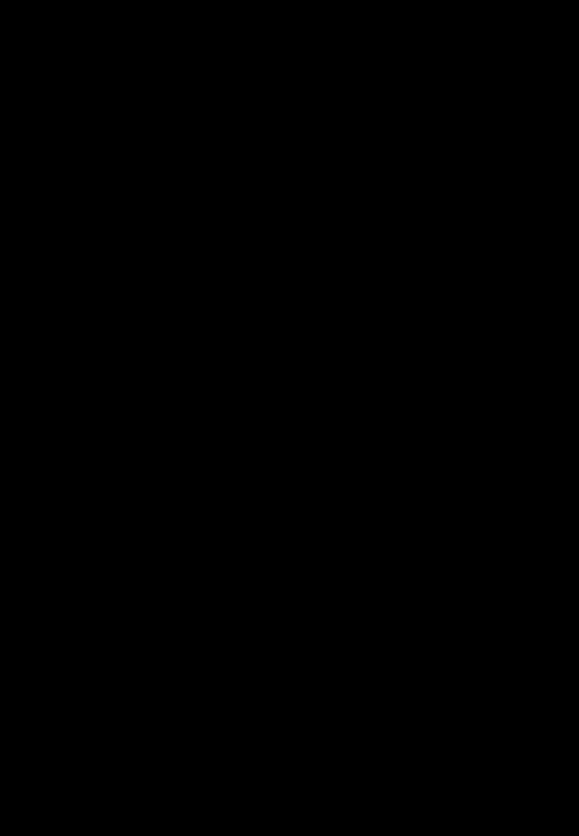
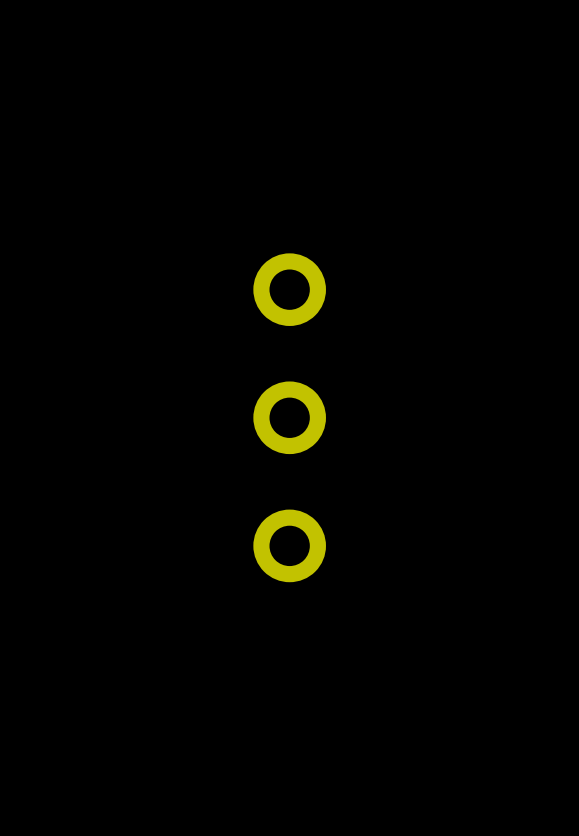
part: none -> (289, 417)

